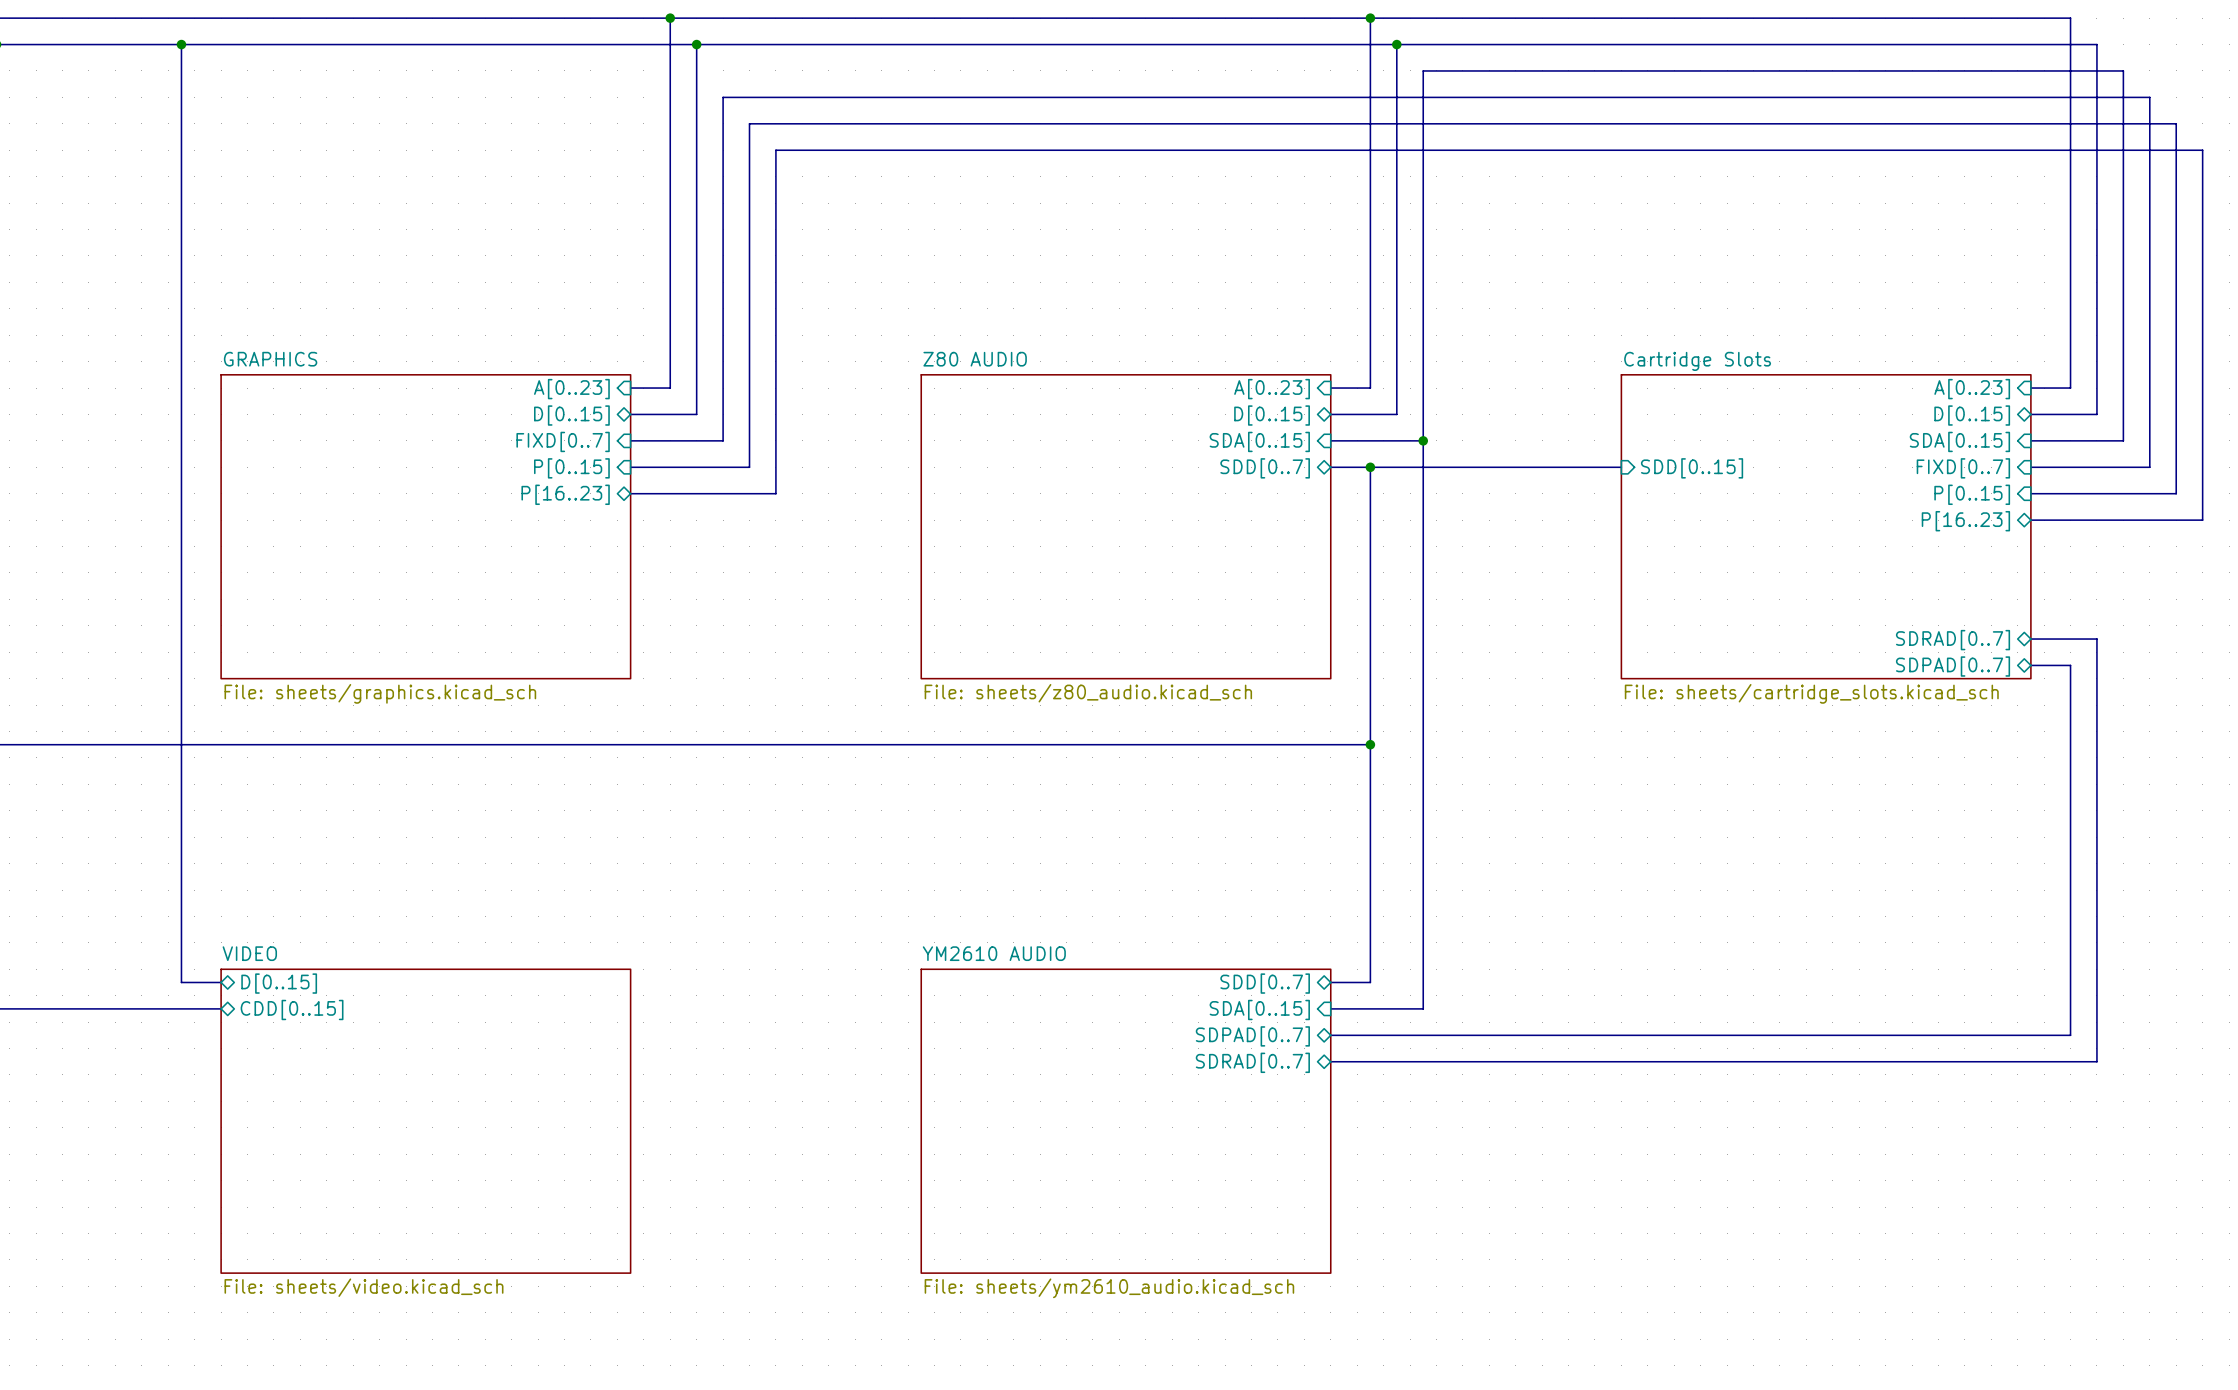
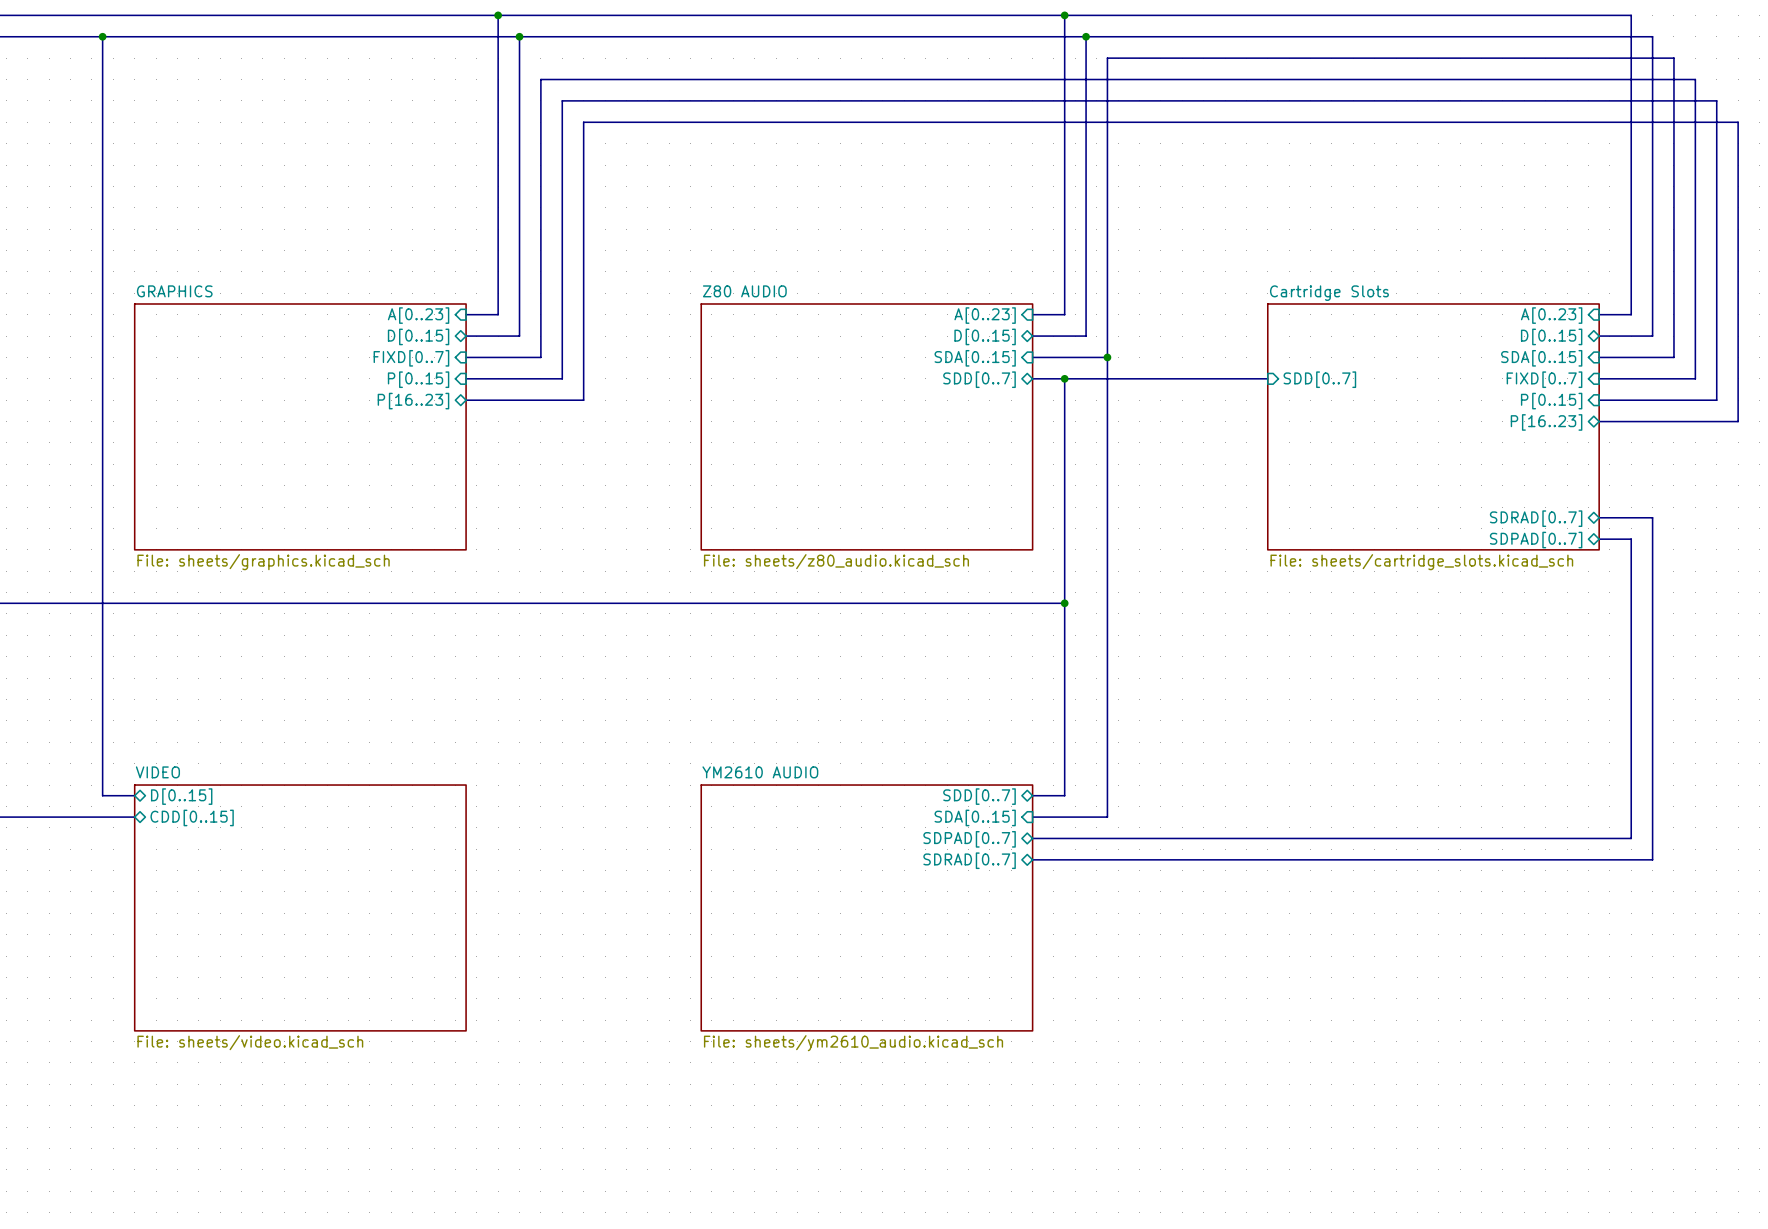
sheet pin: SDD[0..15] (1692, 468) -> SDD[0..7] (1319, 379)

